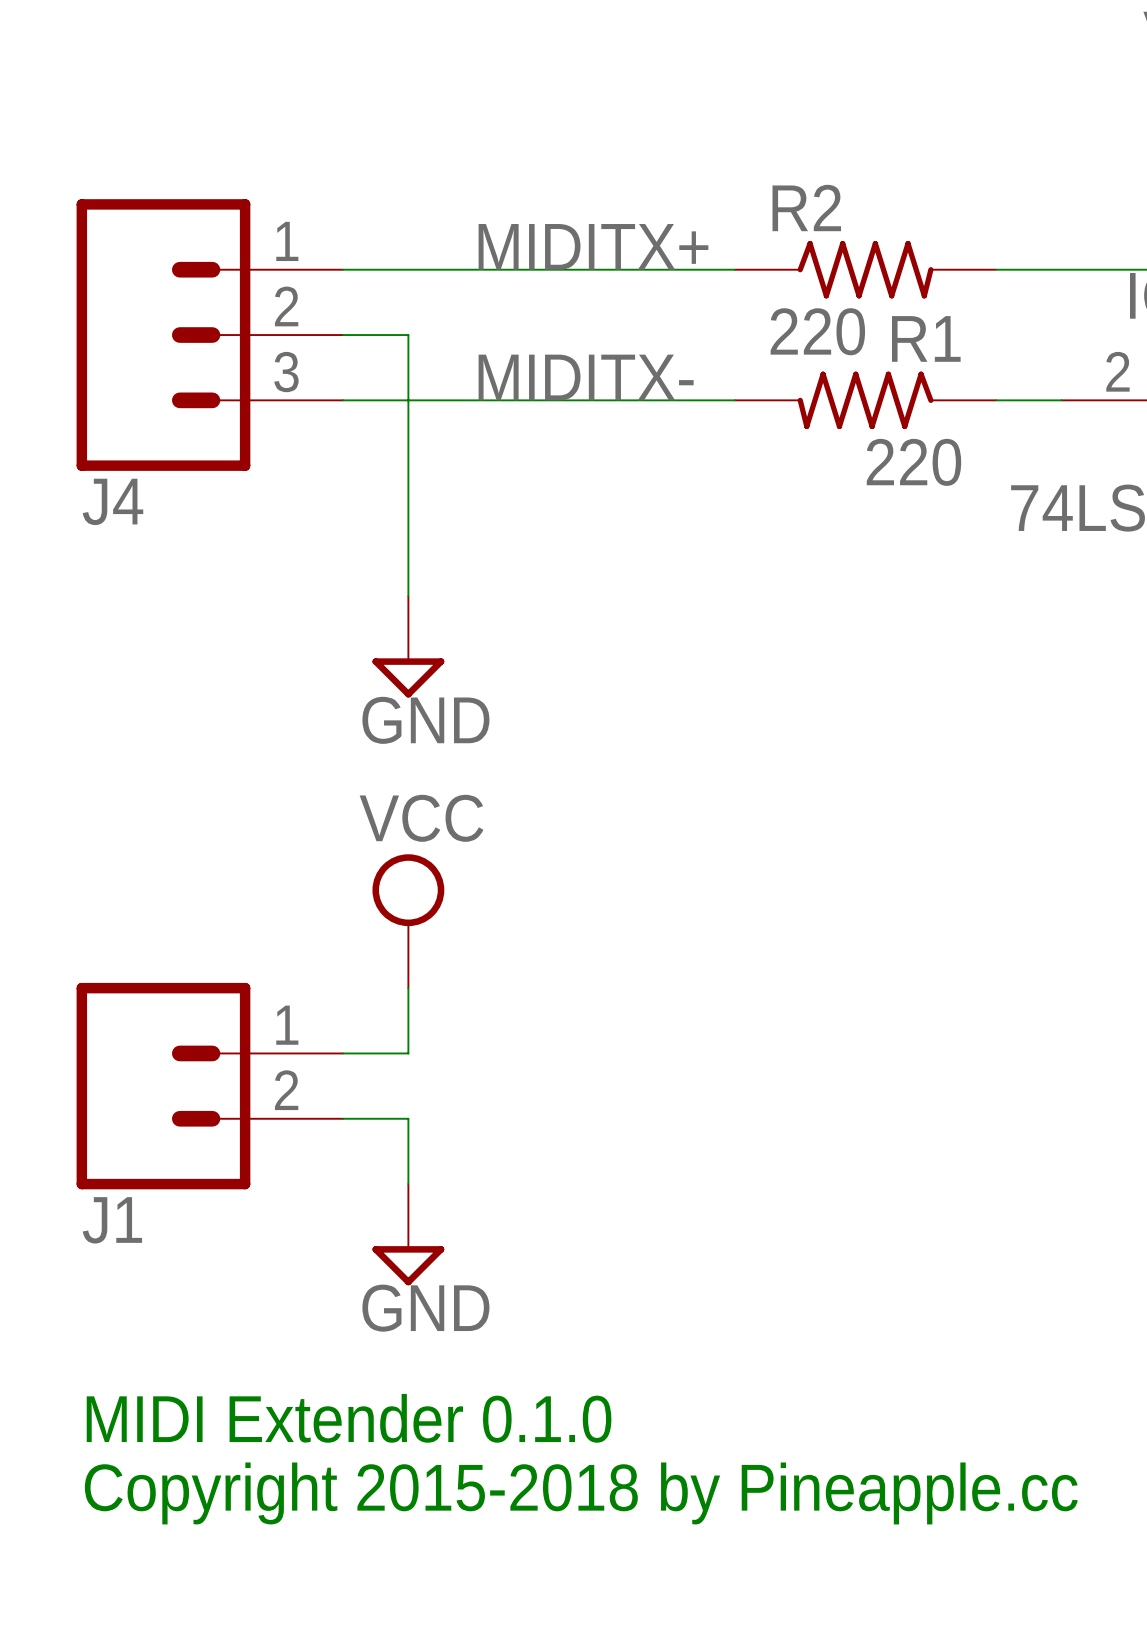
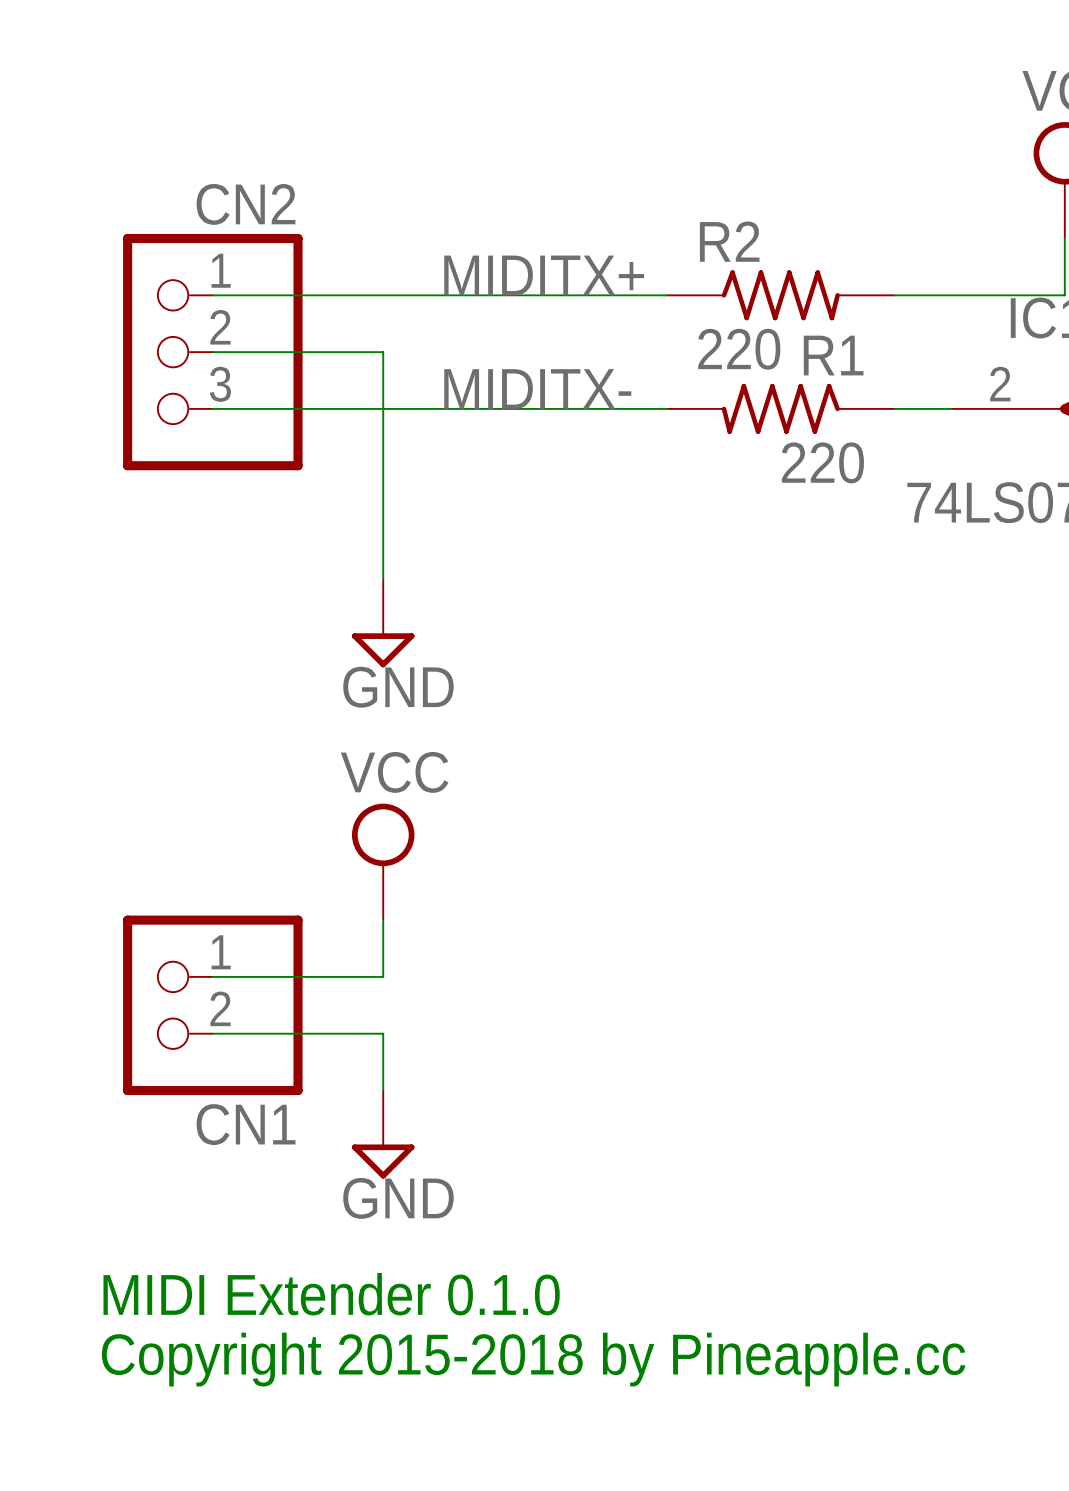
J4: (209, 335) -> none
CN2: none -> (212, 352)
J1: (209, 1086) -> none
CN1: none -> (212, 1005)

